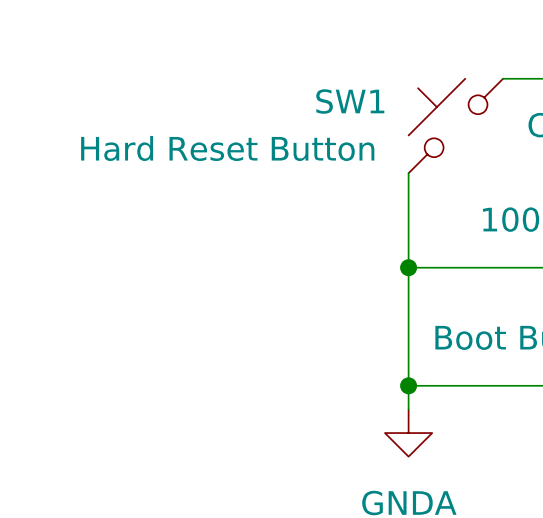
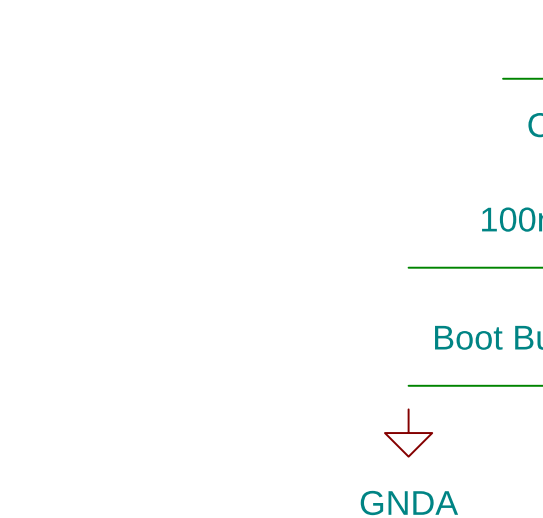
SW1: Hard Reset Button (455, 126) -> none
wire: (408, 173) (408, 409) -> none
junction: (408, 267) -> none
junction: (408, 385) -> none

